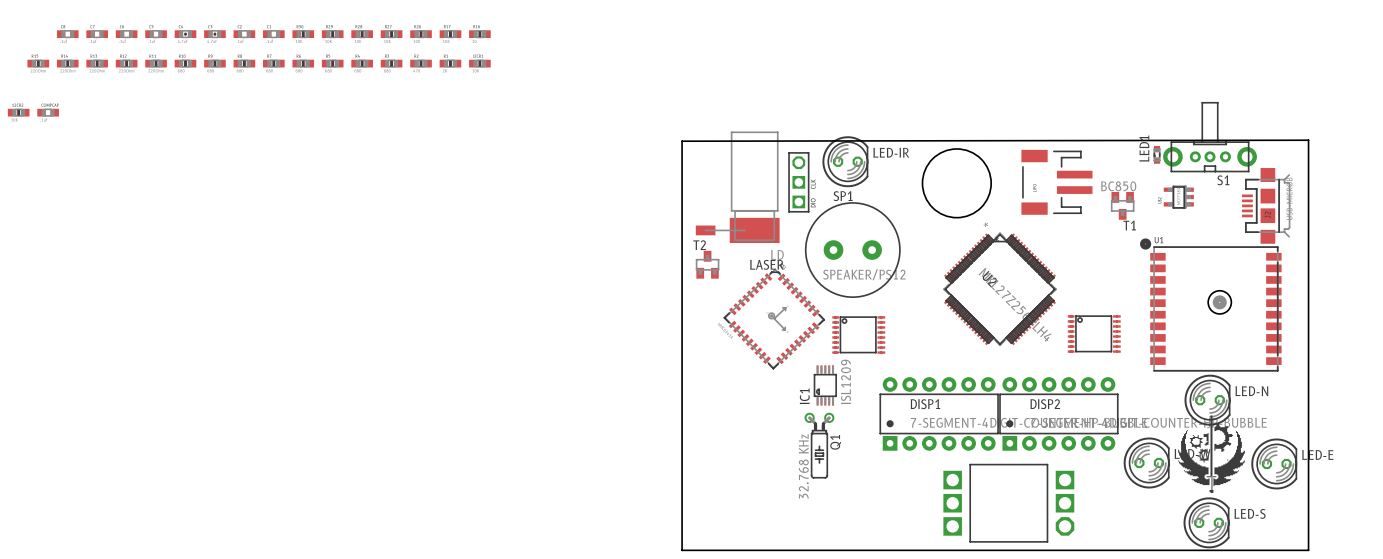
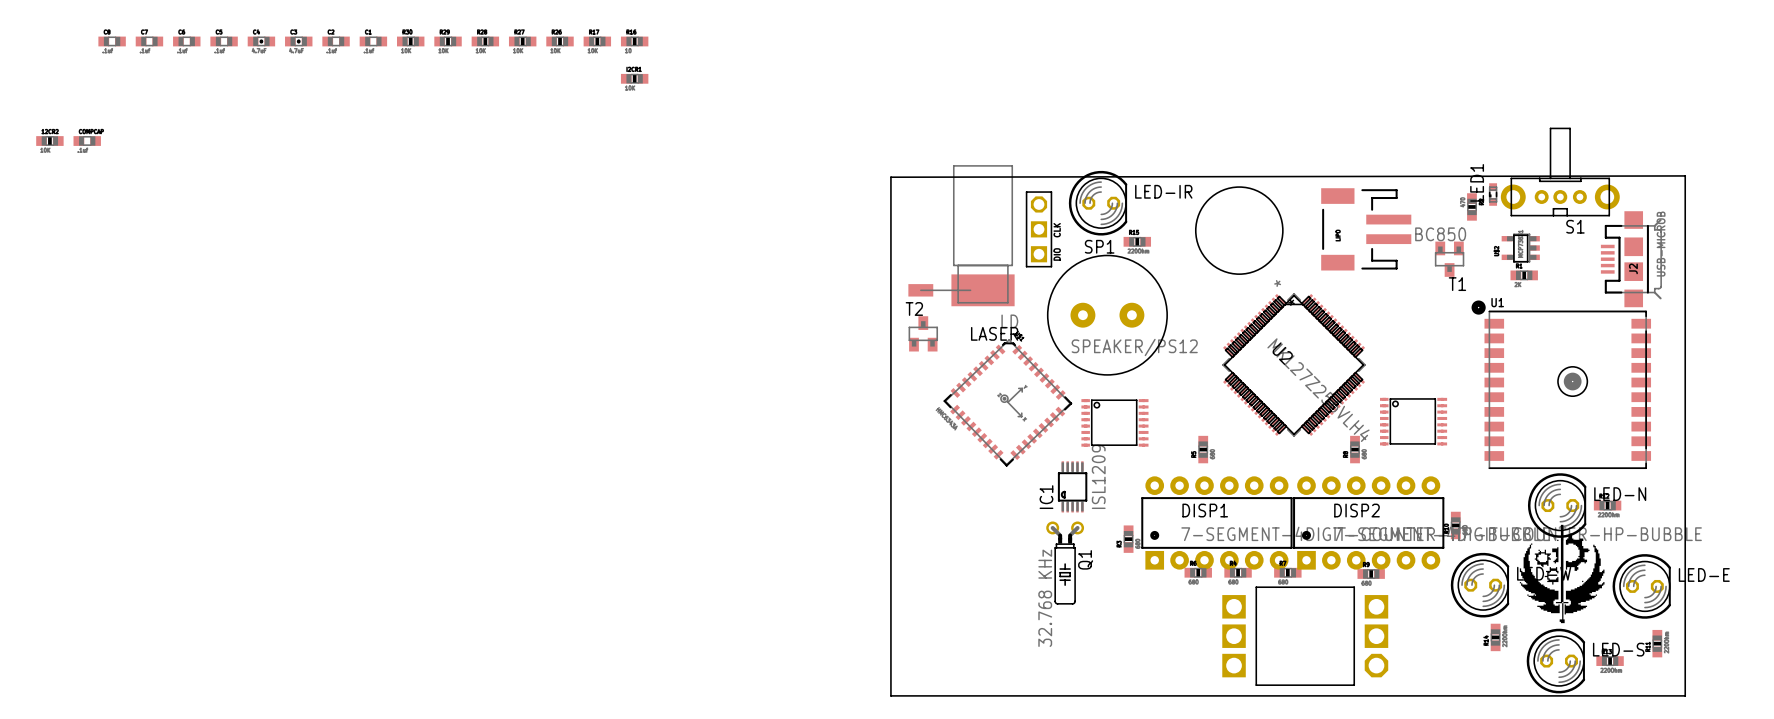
part position: (38, 63) -> (1137, 241)
part rotation: 0° (67, 63) -> 90° clockwise (1495, 637)
part position: (67, 63) -> (1495, 637)
part position: (97, 63) -> (1610, 661)
part position: (126, 63) -> (1607, 505)
part rotation: 0° (156, 63) -> 90° clockwise (1657, 643)
part position: (156, 63) -> (1657, 643)
part rotation: 0° (185, 63) -> 90° clockwise (1455, 525)
part position: (185, 63) -> (1455, 525)
part position: (214, 63) -> (1371, 573)
part rotation: 0° (244, 63) -> 90° clockwise (1355, 449)
part position: (244, 63) -> (1355, 449)
part position: (273, 63) -> (1287, 572)
part position: (303, 63) -> (1198, 572)
part rotation: 0° (332, 63) -> 90° clockwise (1203, 449)
part position: (332, 63) -> (1203, 449)
part position: (362, 63) -> (1238, 572)
part rotation: 0° (391, 63) -> 90° clockwise (1128, 539)
part position: (391, 63) -> (1128, 539)
part rotation: 0° (421, 63) -> 90° clockwise (1471, 206)
part position: (421, 63) -> (1471, 206)
part position: (450, 63) -> (1524, 275)

